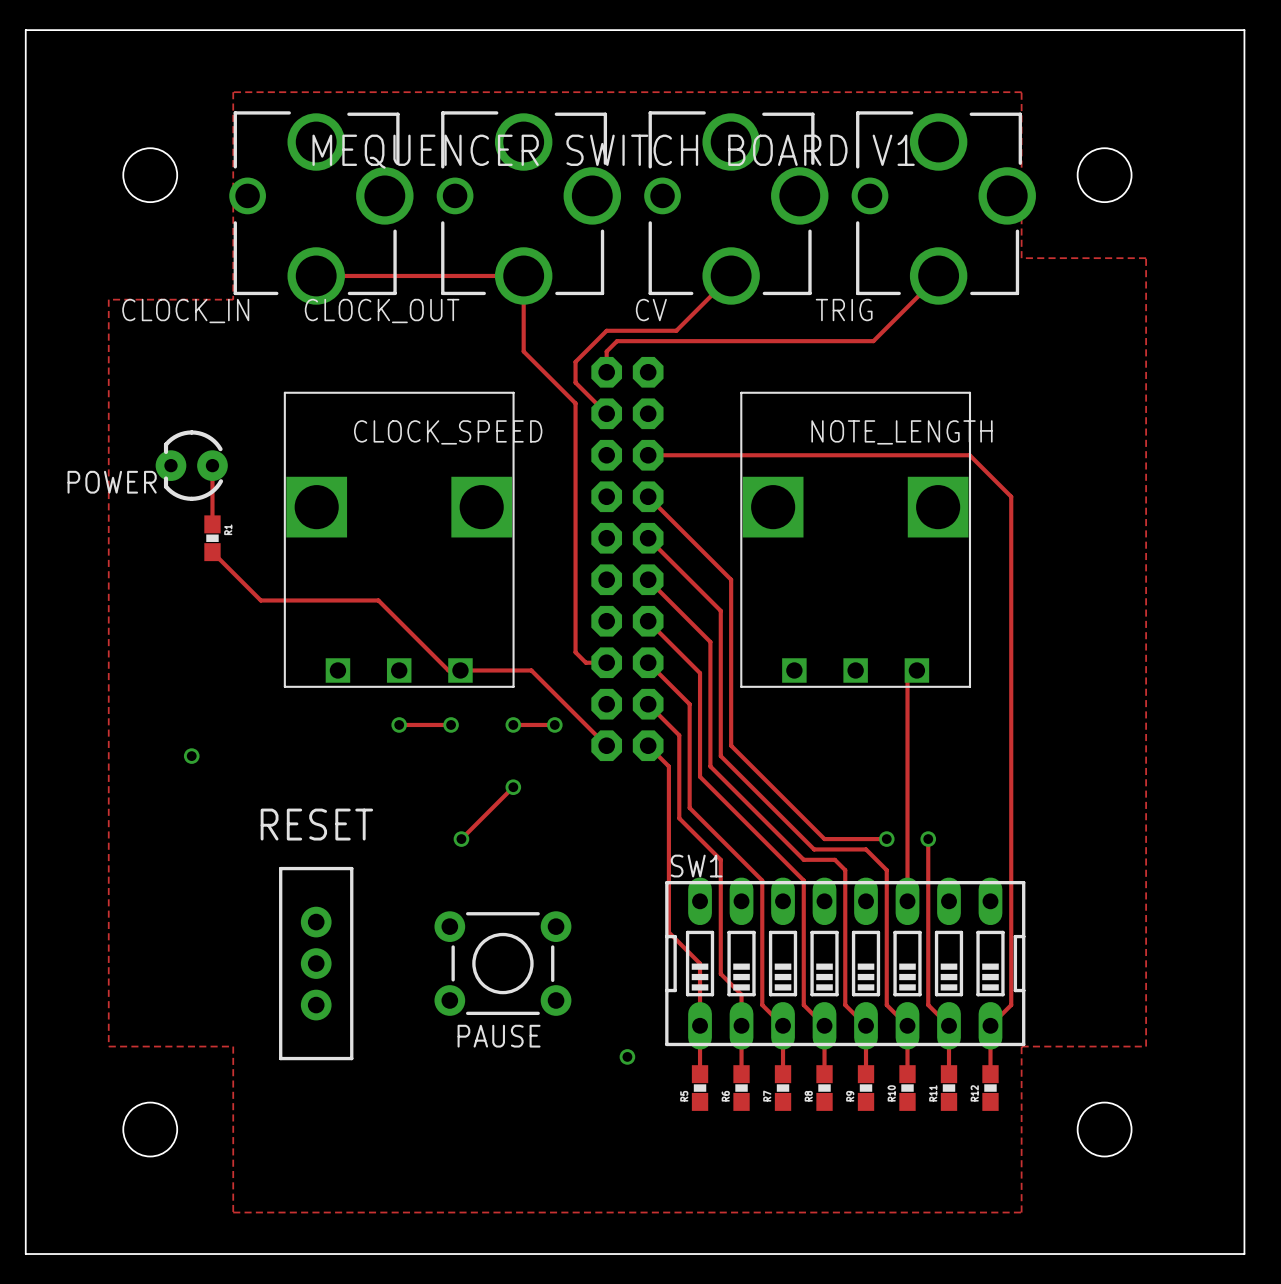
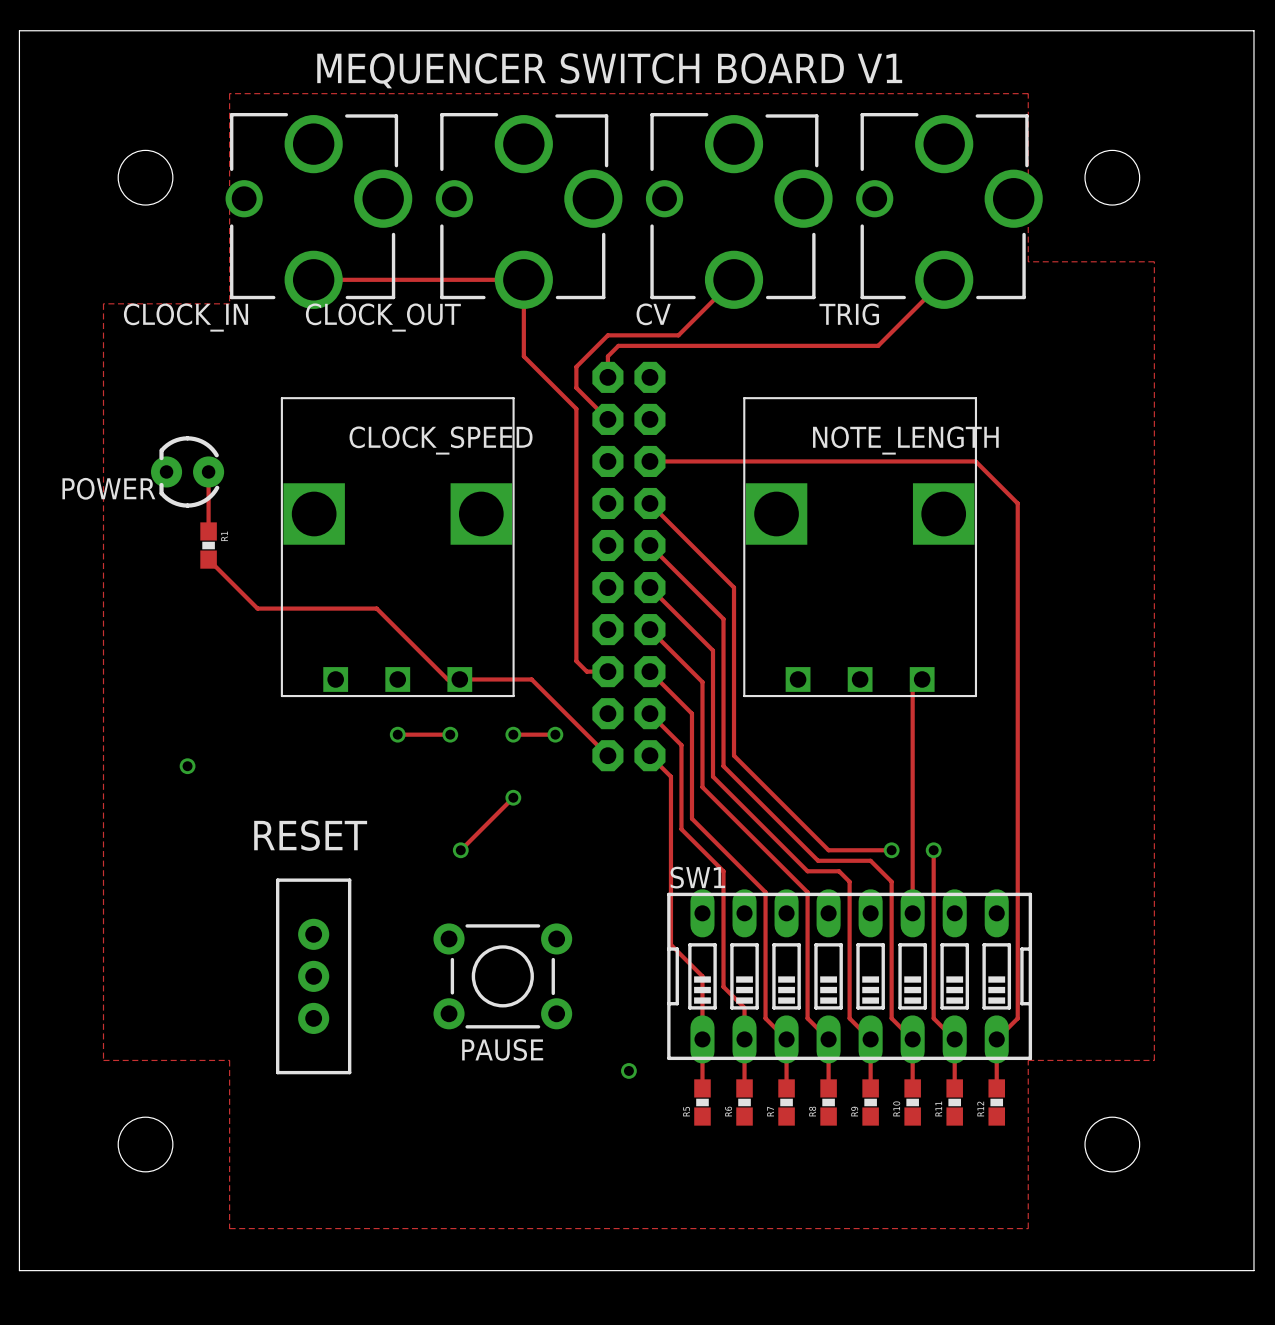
text position: MEQUENCER SWITCH BOARD V1 (613, 151) -> MEQUENCER SWITCH BOARD V1 (609, 70)

